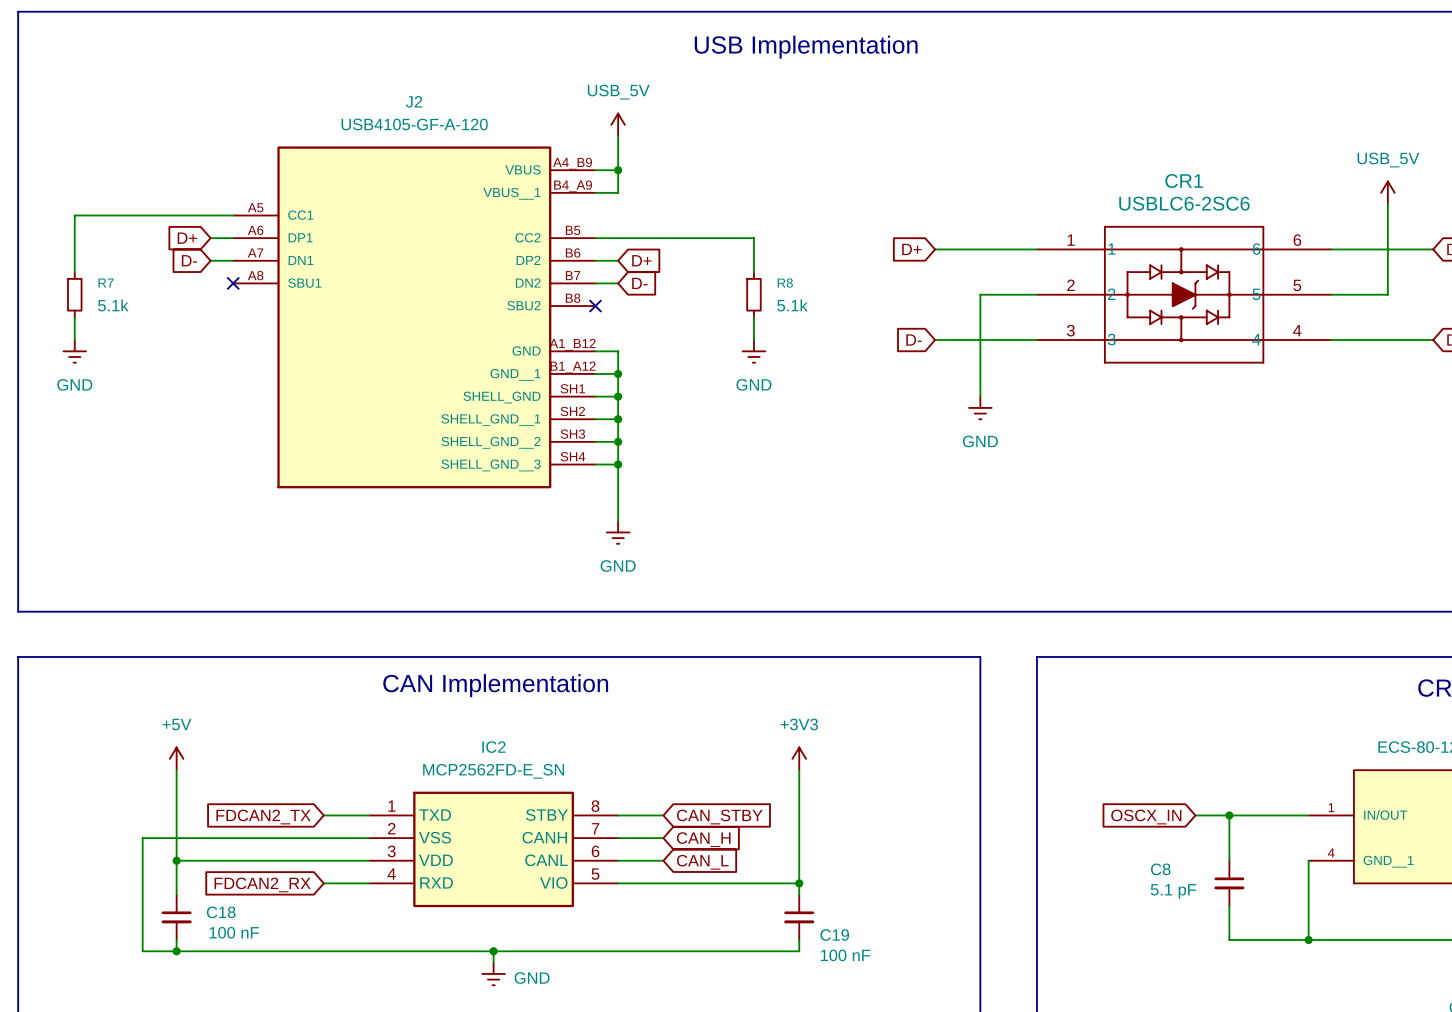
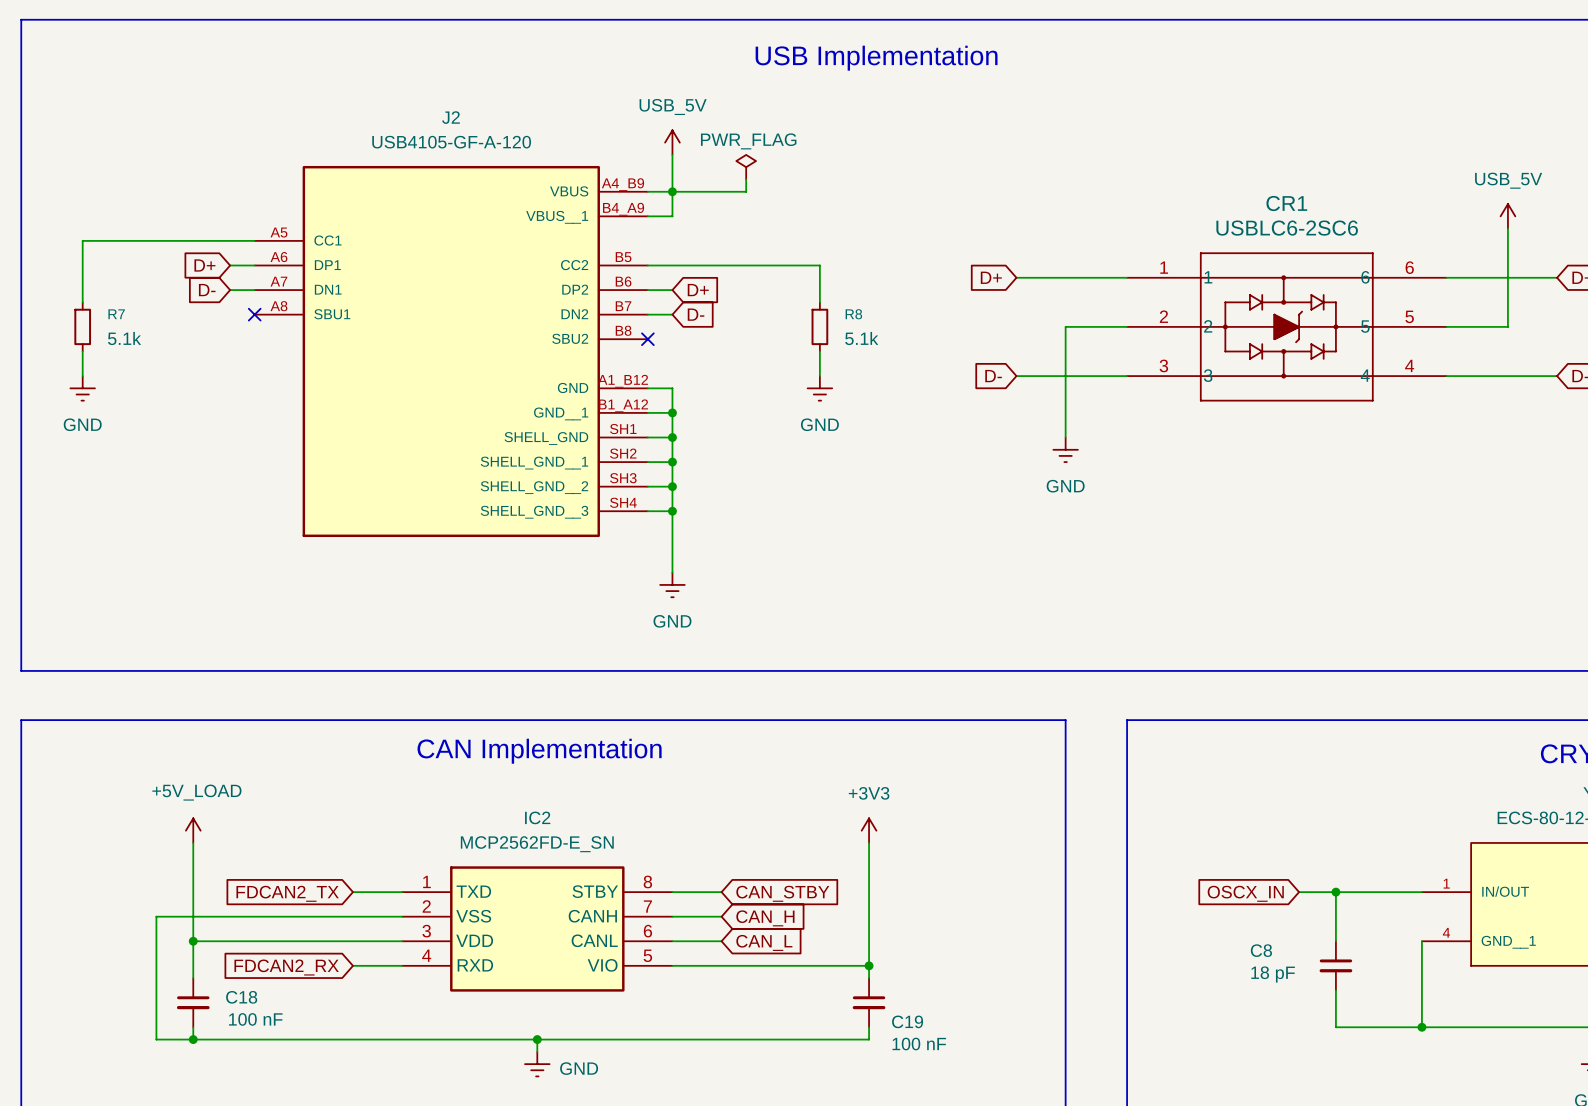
power symbol: none -> PWR_FLAG (746, 167)
wire: none -> (746, 179) (746, 191) (672, 191)
power symbol: +5V (176, 758) -> +5V_LOAD (193, 830)
C8 value: 5.1 pF (1173, 891) -> 18 pF (1273, 974)

